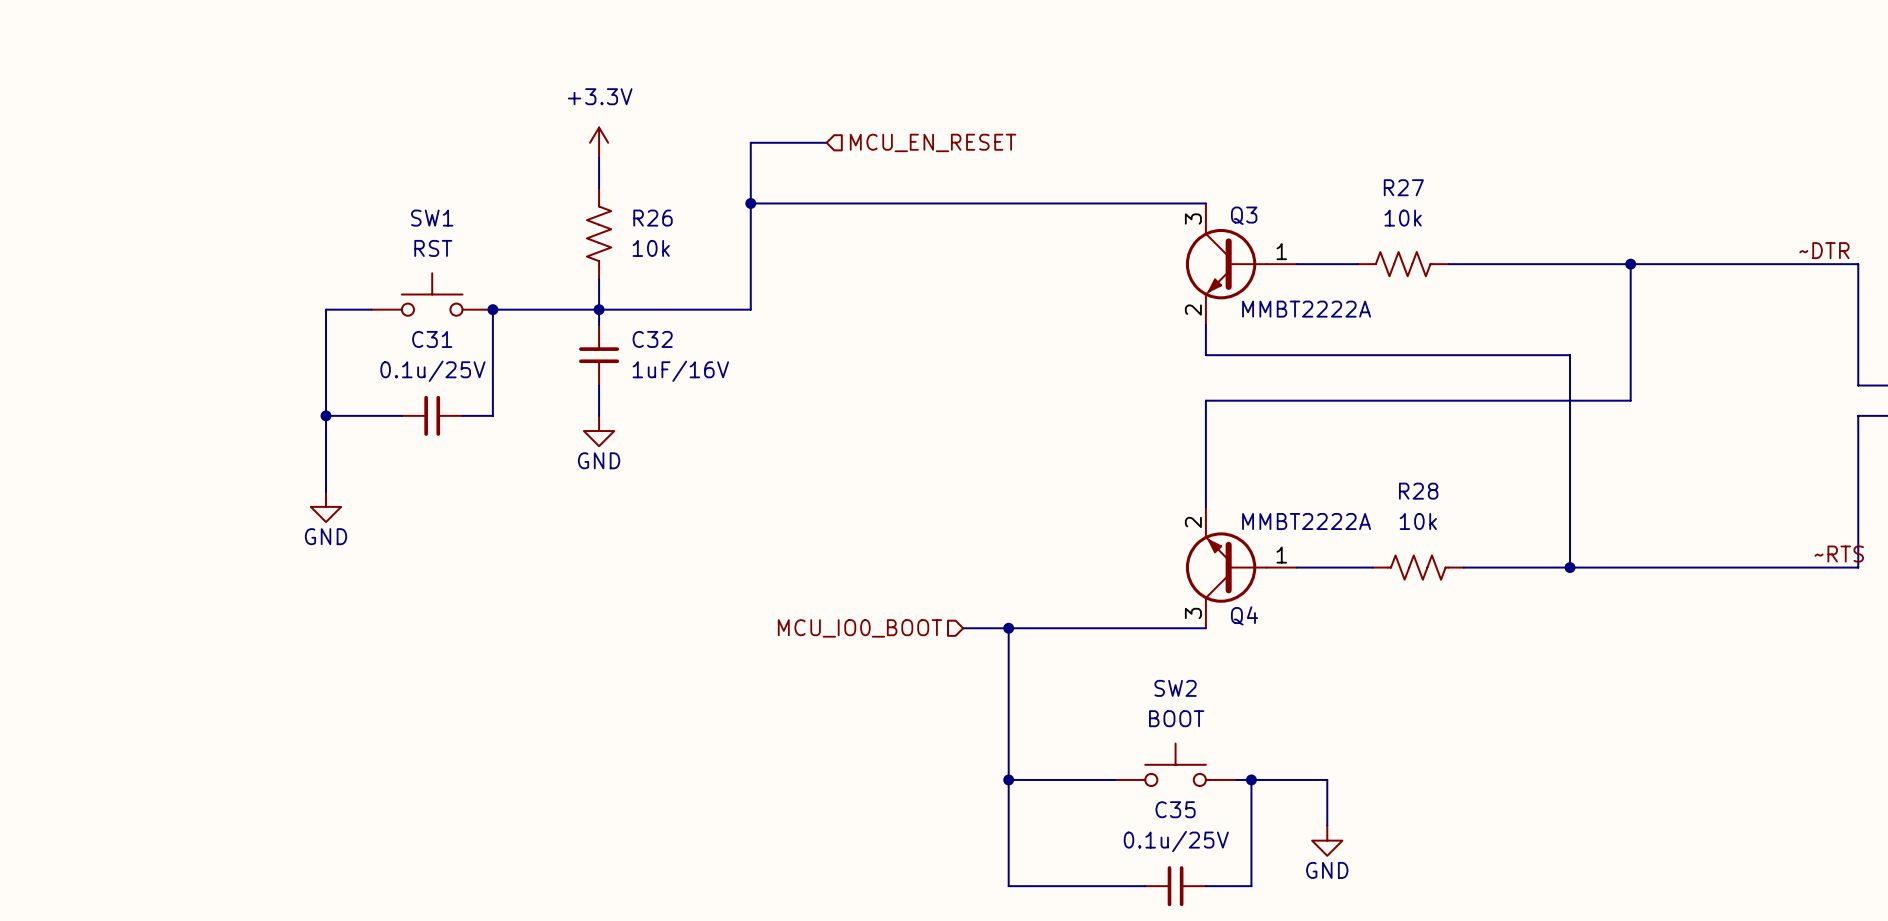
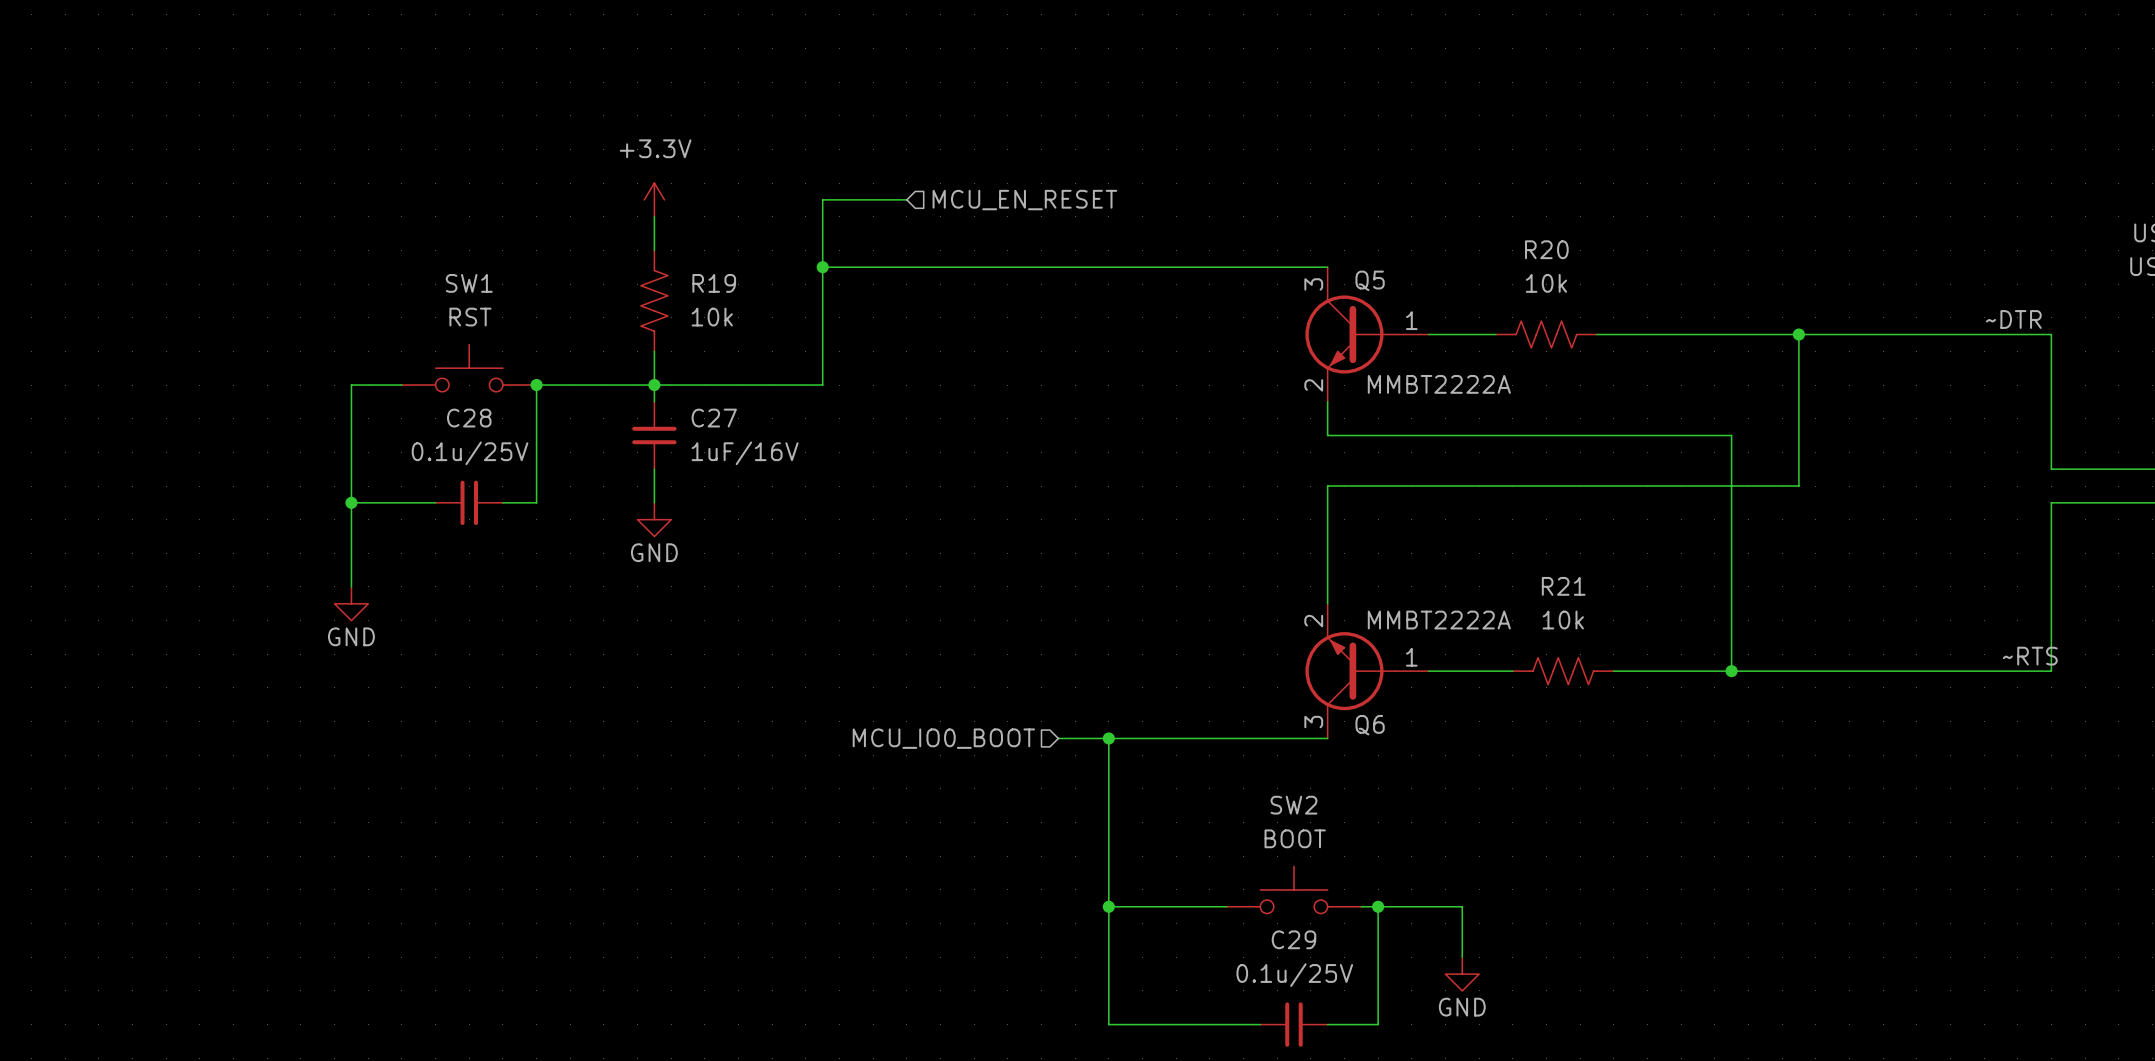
R27 name: R27 (1403, 187) -> R20 (1546, 249)
Q3 name: Q3 (1244, 215) -> Q5 (1370, 280)
R26 name: R26 (653, 218) -> R19 (714, 283)
C31 name: C31 (432, 339) -> C28 (469, 418)
C32 name: C32 (652, 339) -> C27 (714, 418)
R28 name: R28 (1418, 491) -> R21 (1563, 586)
Q4 name: Q4 (1244, 615) -> Q6 (1370, 725)
C35 name: C35 (1175, 809) -> C29 (1293, 939)

